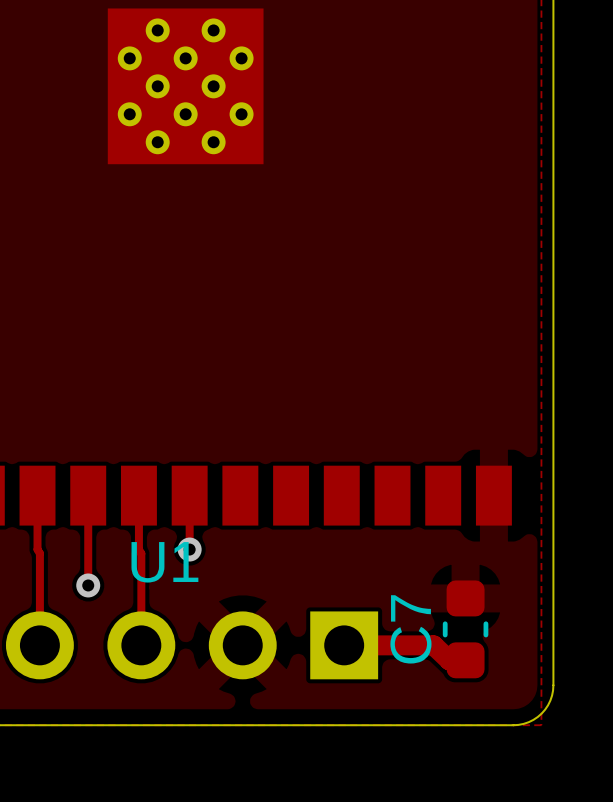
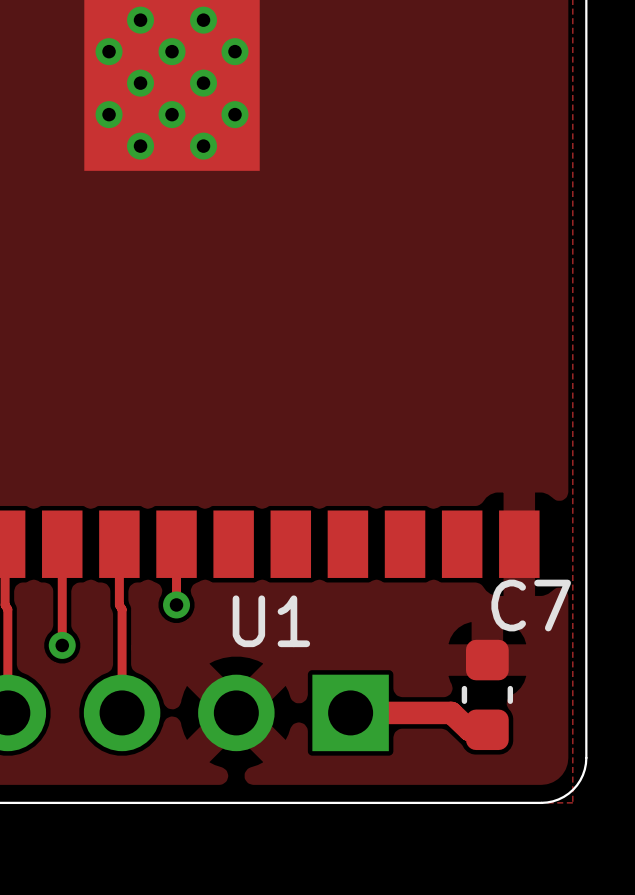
U1 name position: U1 (164, 562) -> U1 (271, 621)
C7 name rotation: 0° (410, 629) -> 90° clockwise (531, 605)
C7 name position: C7 (410, 629) -> C7 (531, 605)

